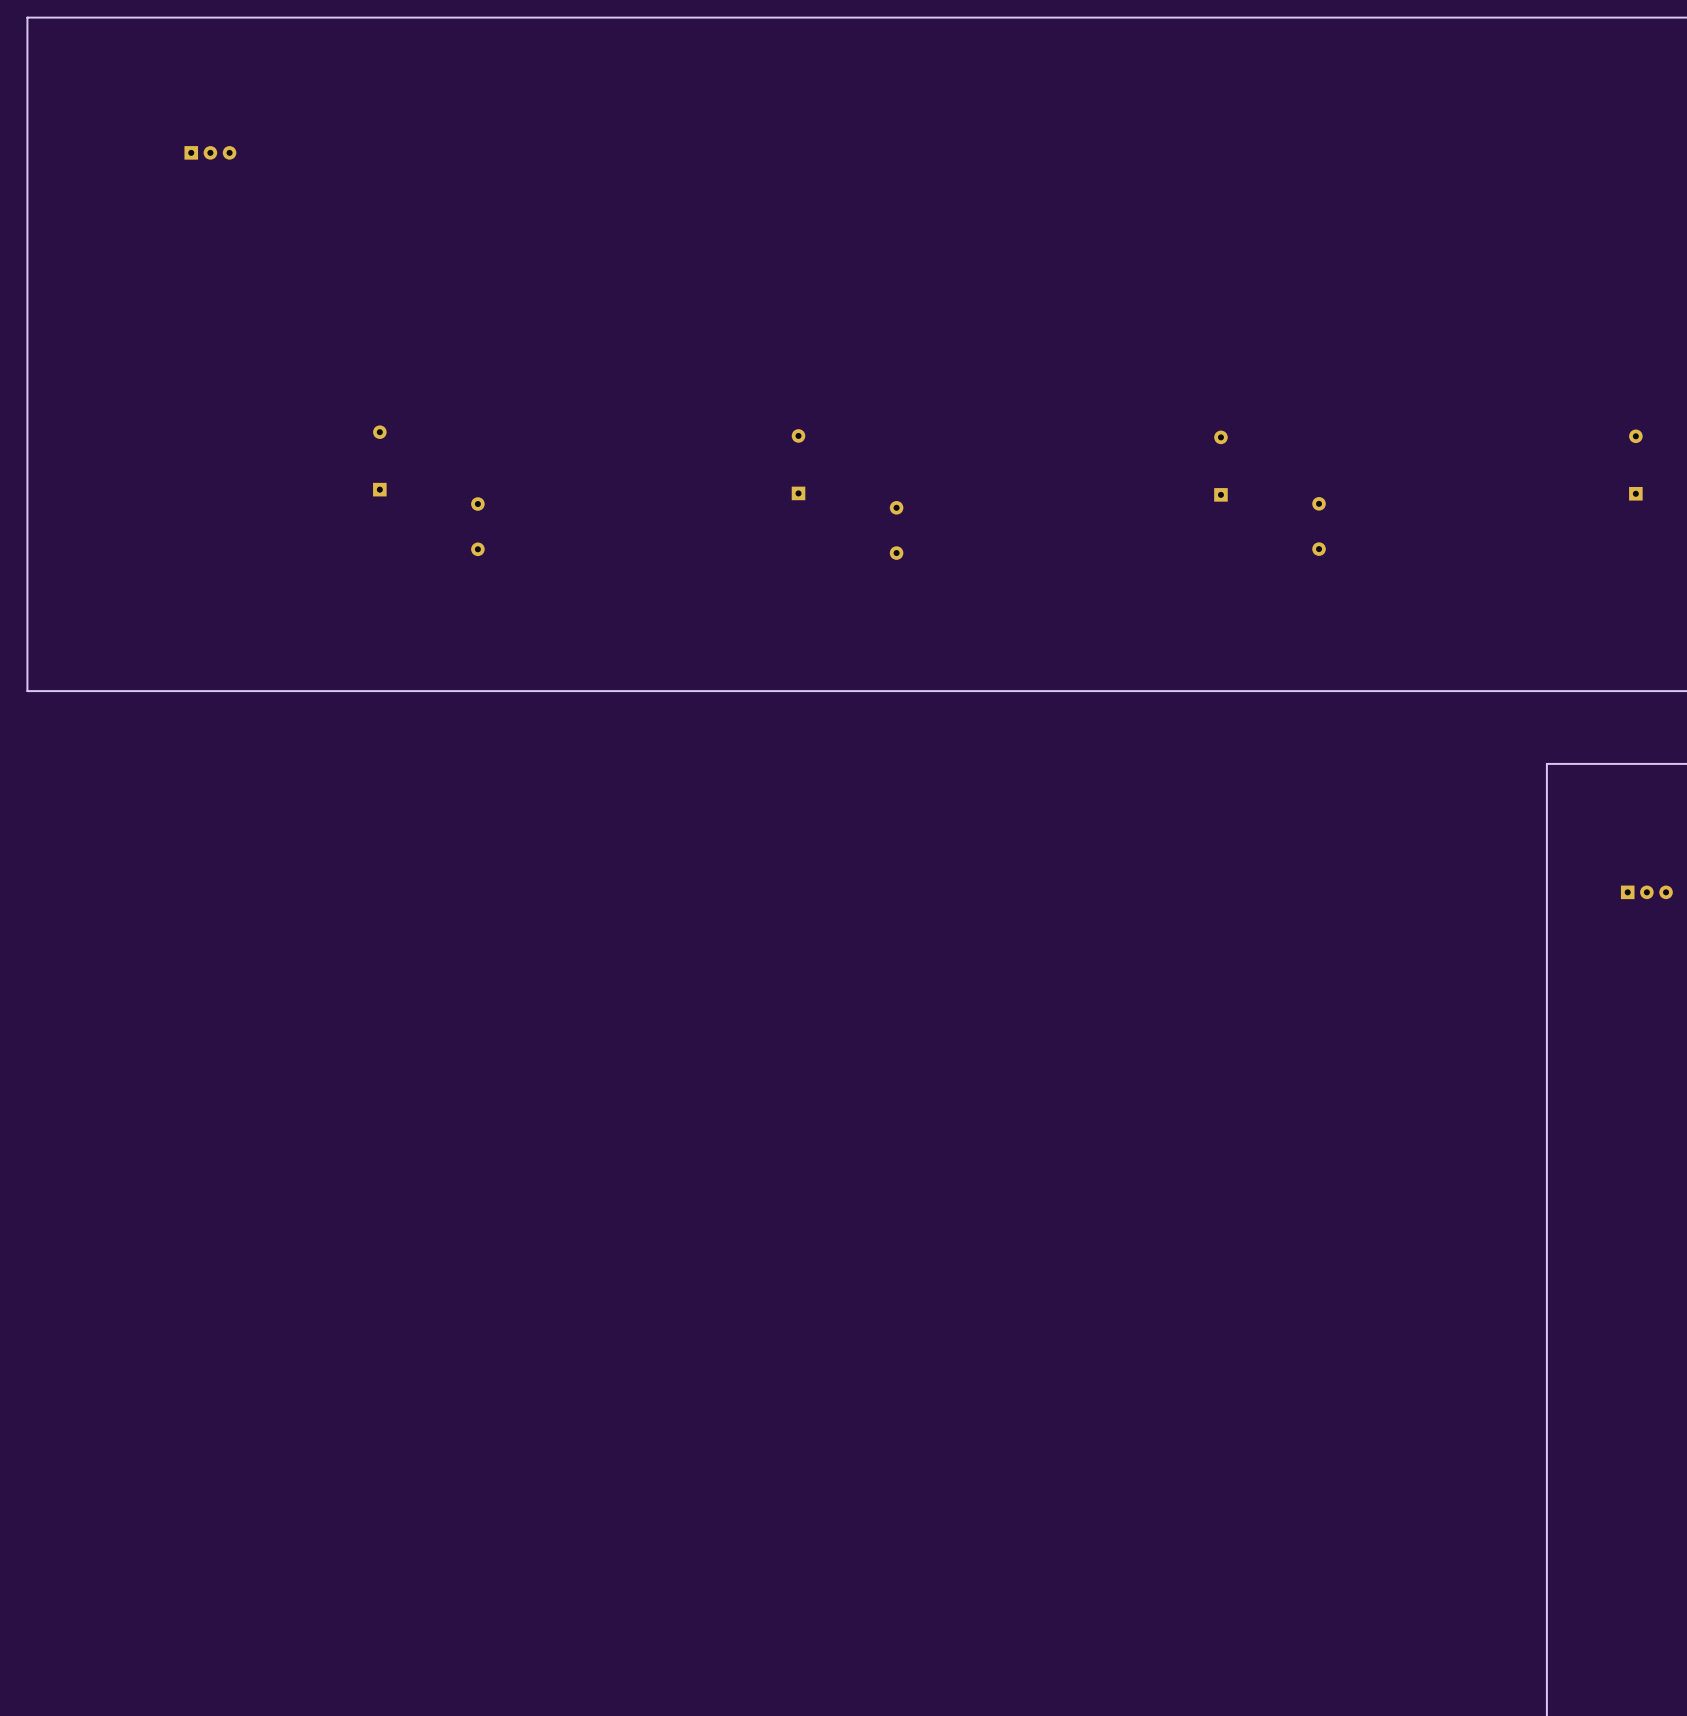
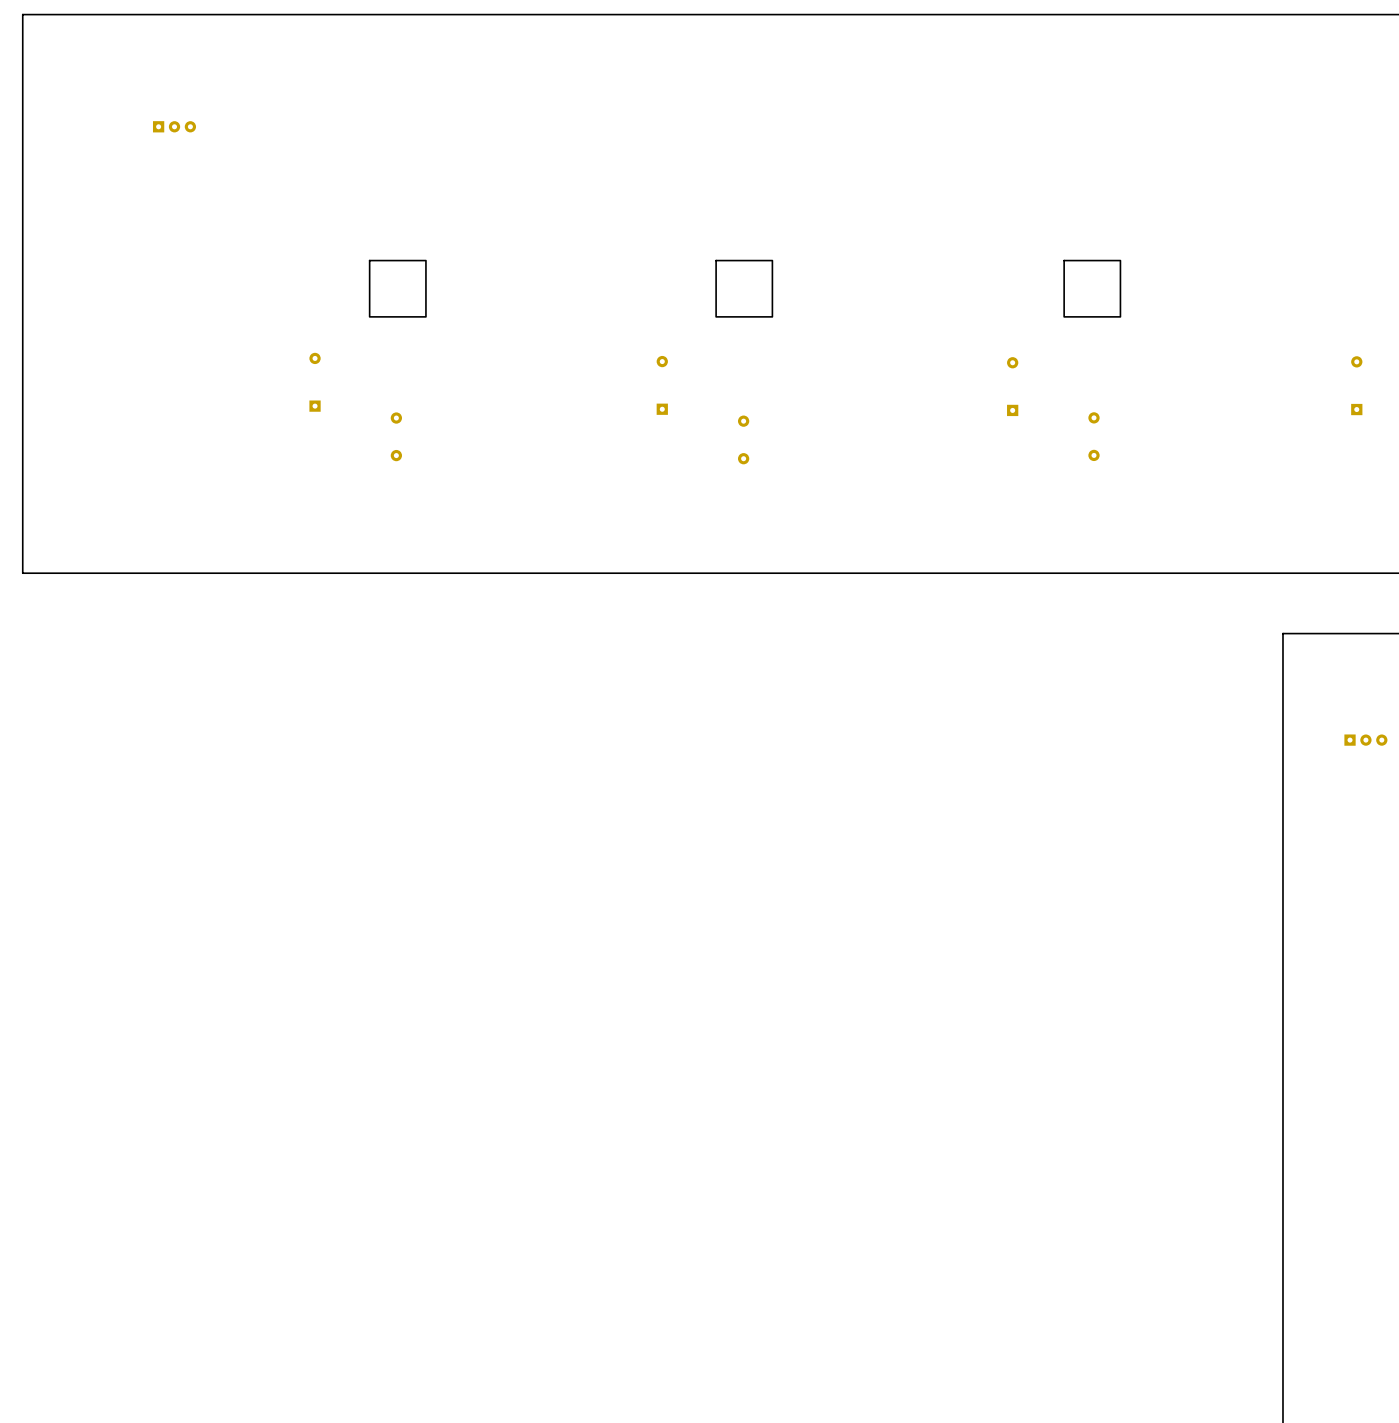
part: none -> (397, 288)
part: none -> (744, 288)
part: none -> (1092, 288)

